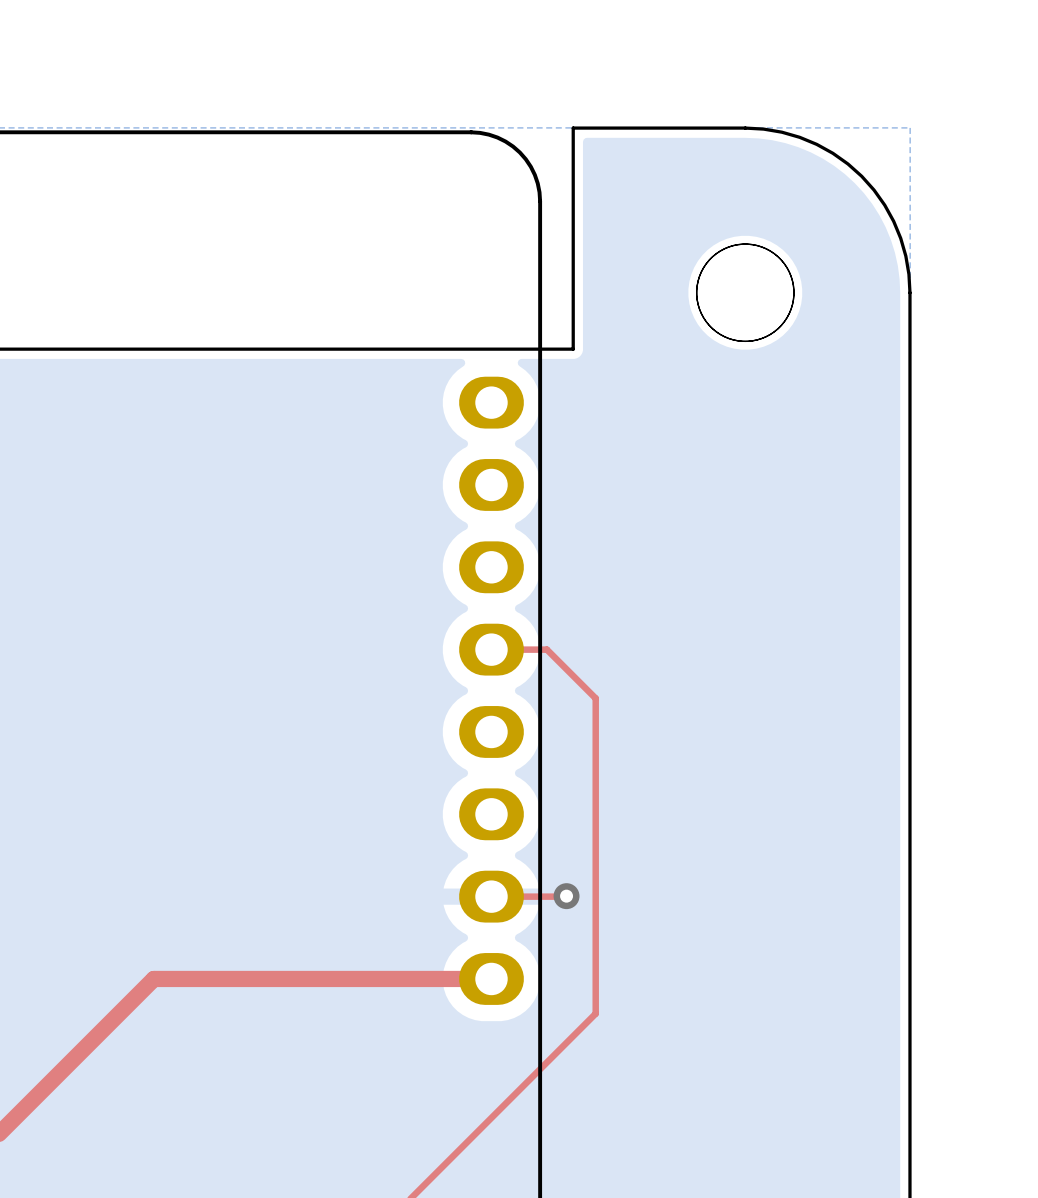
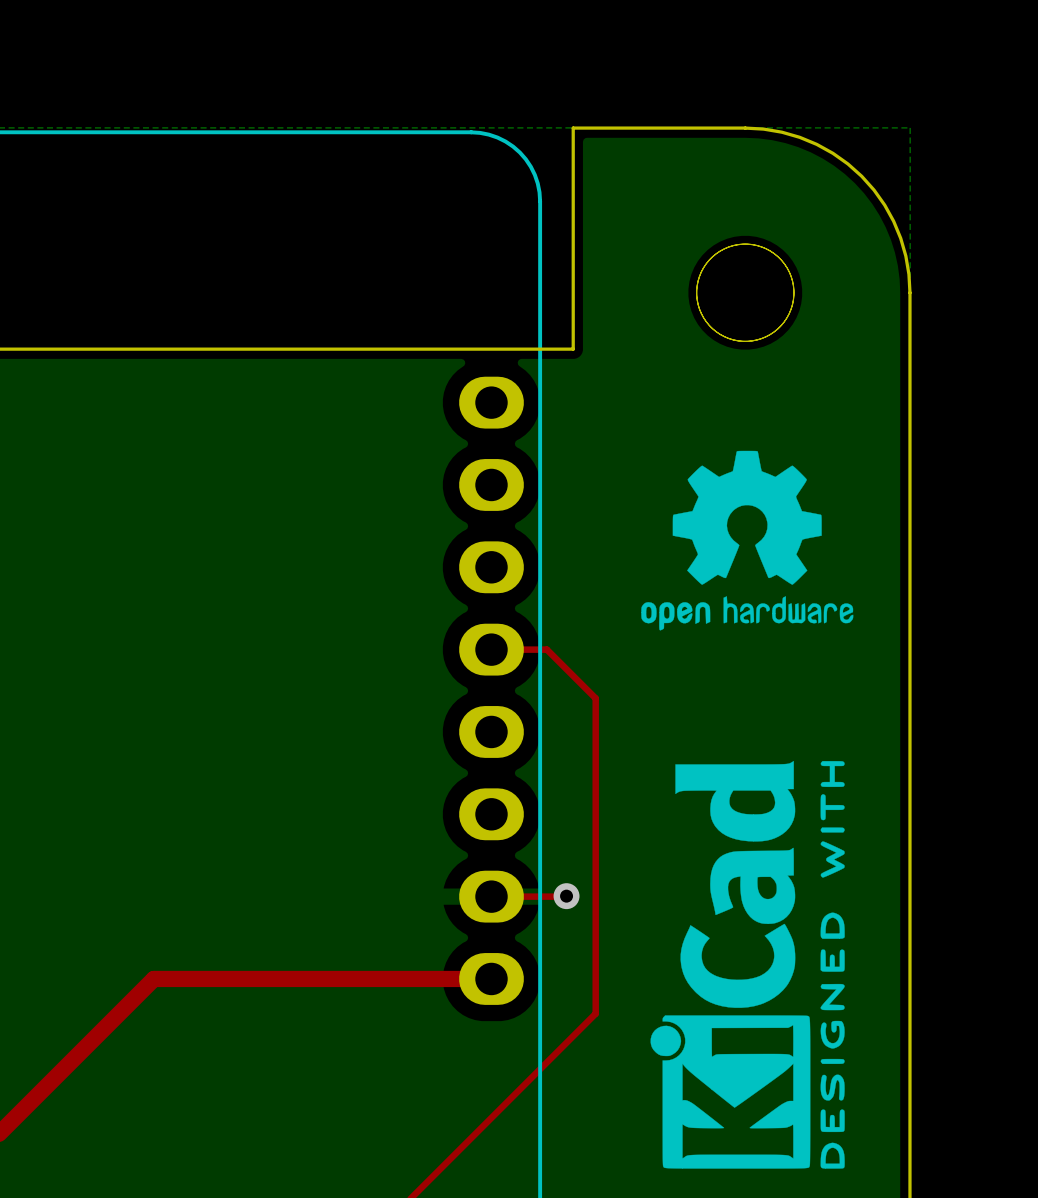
drawing: none -> [641, 450, 854, 631]
drawing: none -> [650, 761, 845, 1169]

